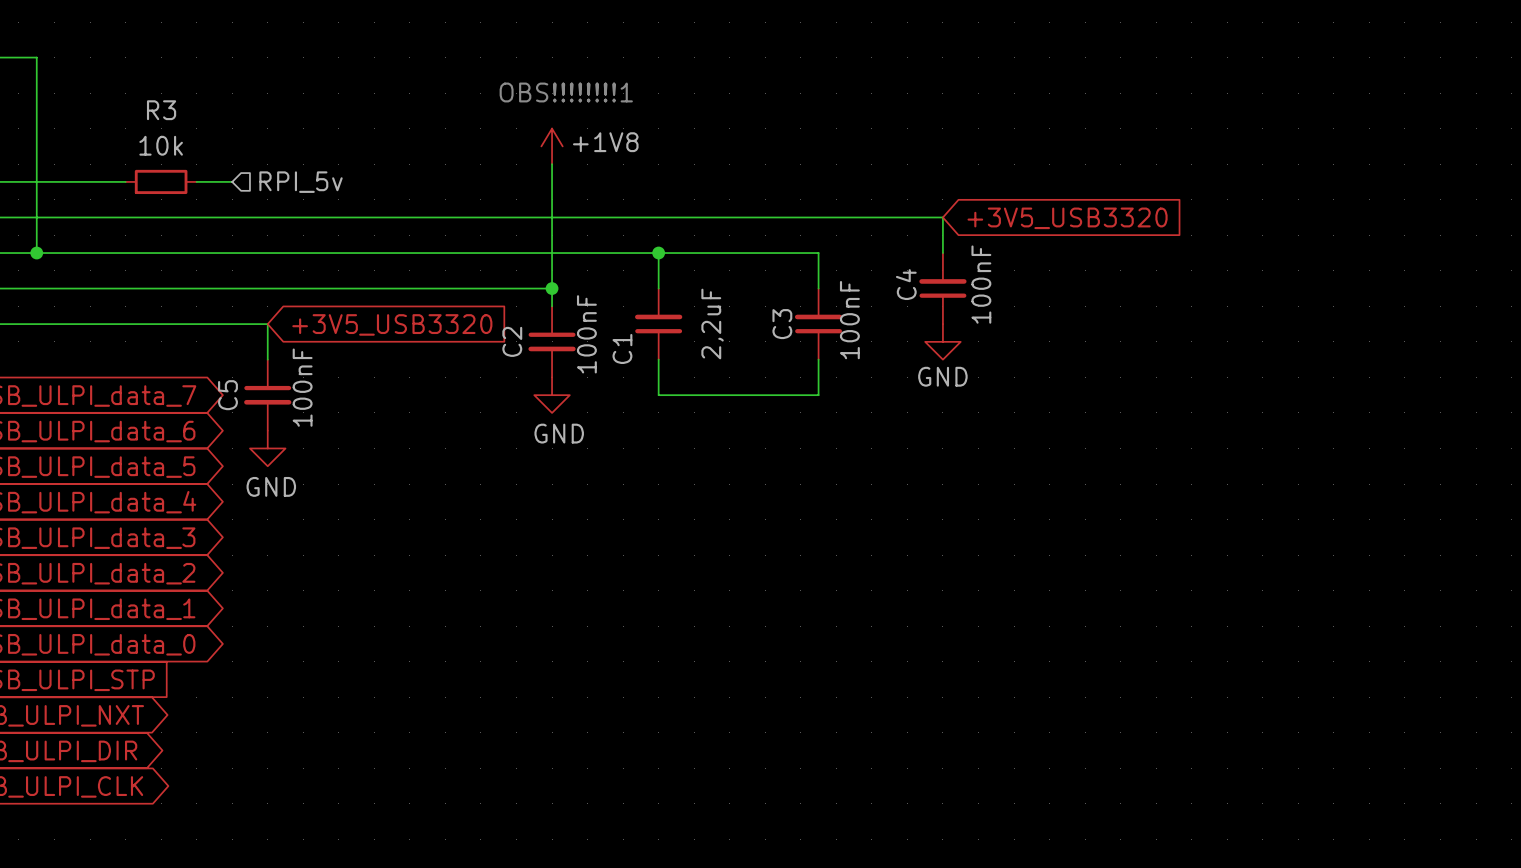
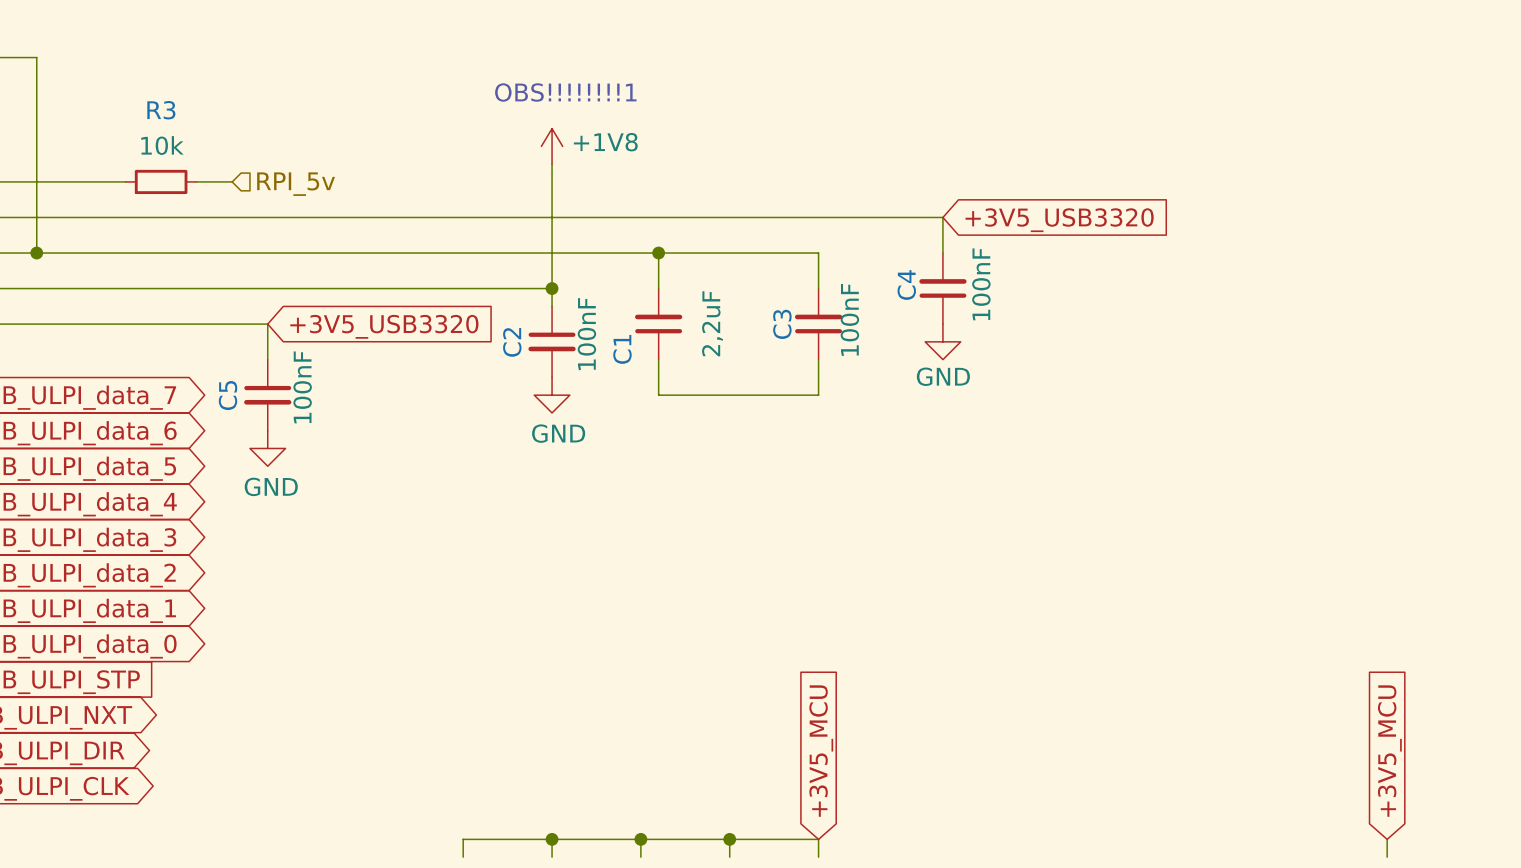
global label: none -> +3V5_MCU (821, 751)
global label: none -> +3V5_MCU (1389, 751)
wire: none -> (552, 839) (552, 857)
junction: none -> (552, 839)
wire: none -> (640, 839) (640, 857)
junction: none -> (640, 839)
wire: none -> (729, 839) (729, 857)
junction: none -> (729, 839)
wire: none -> (1387, 839) (1387, 857)
wire: none -> (463, 857) (463, 839) (818, 839) (818, 857)

